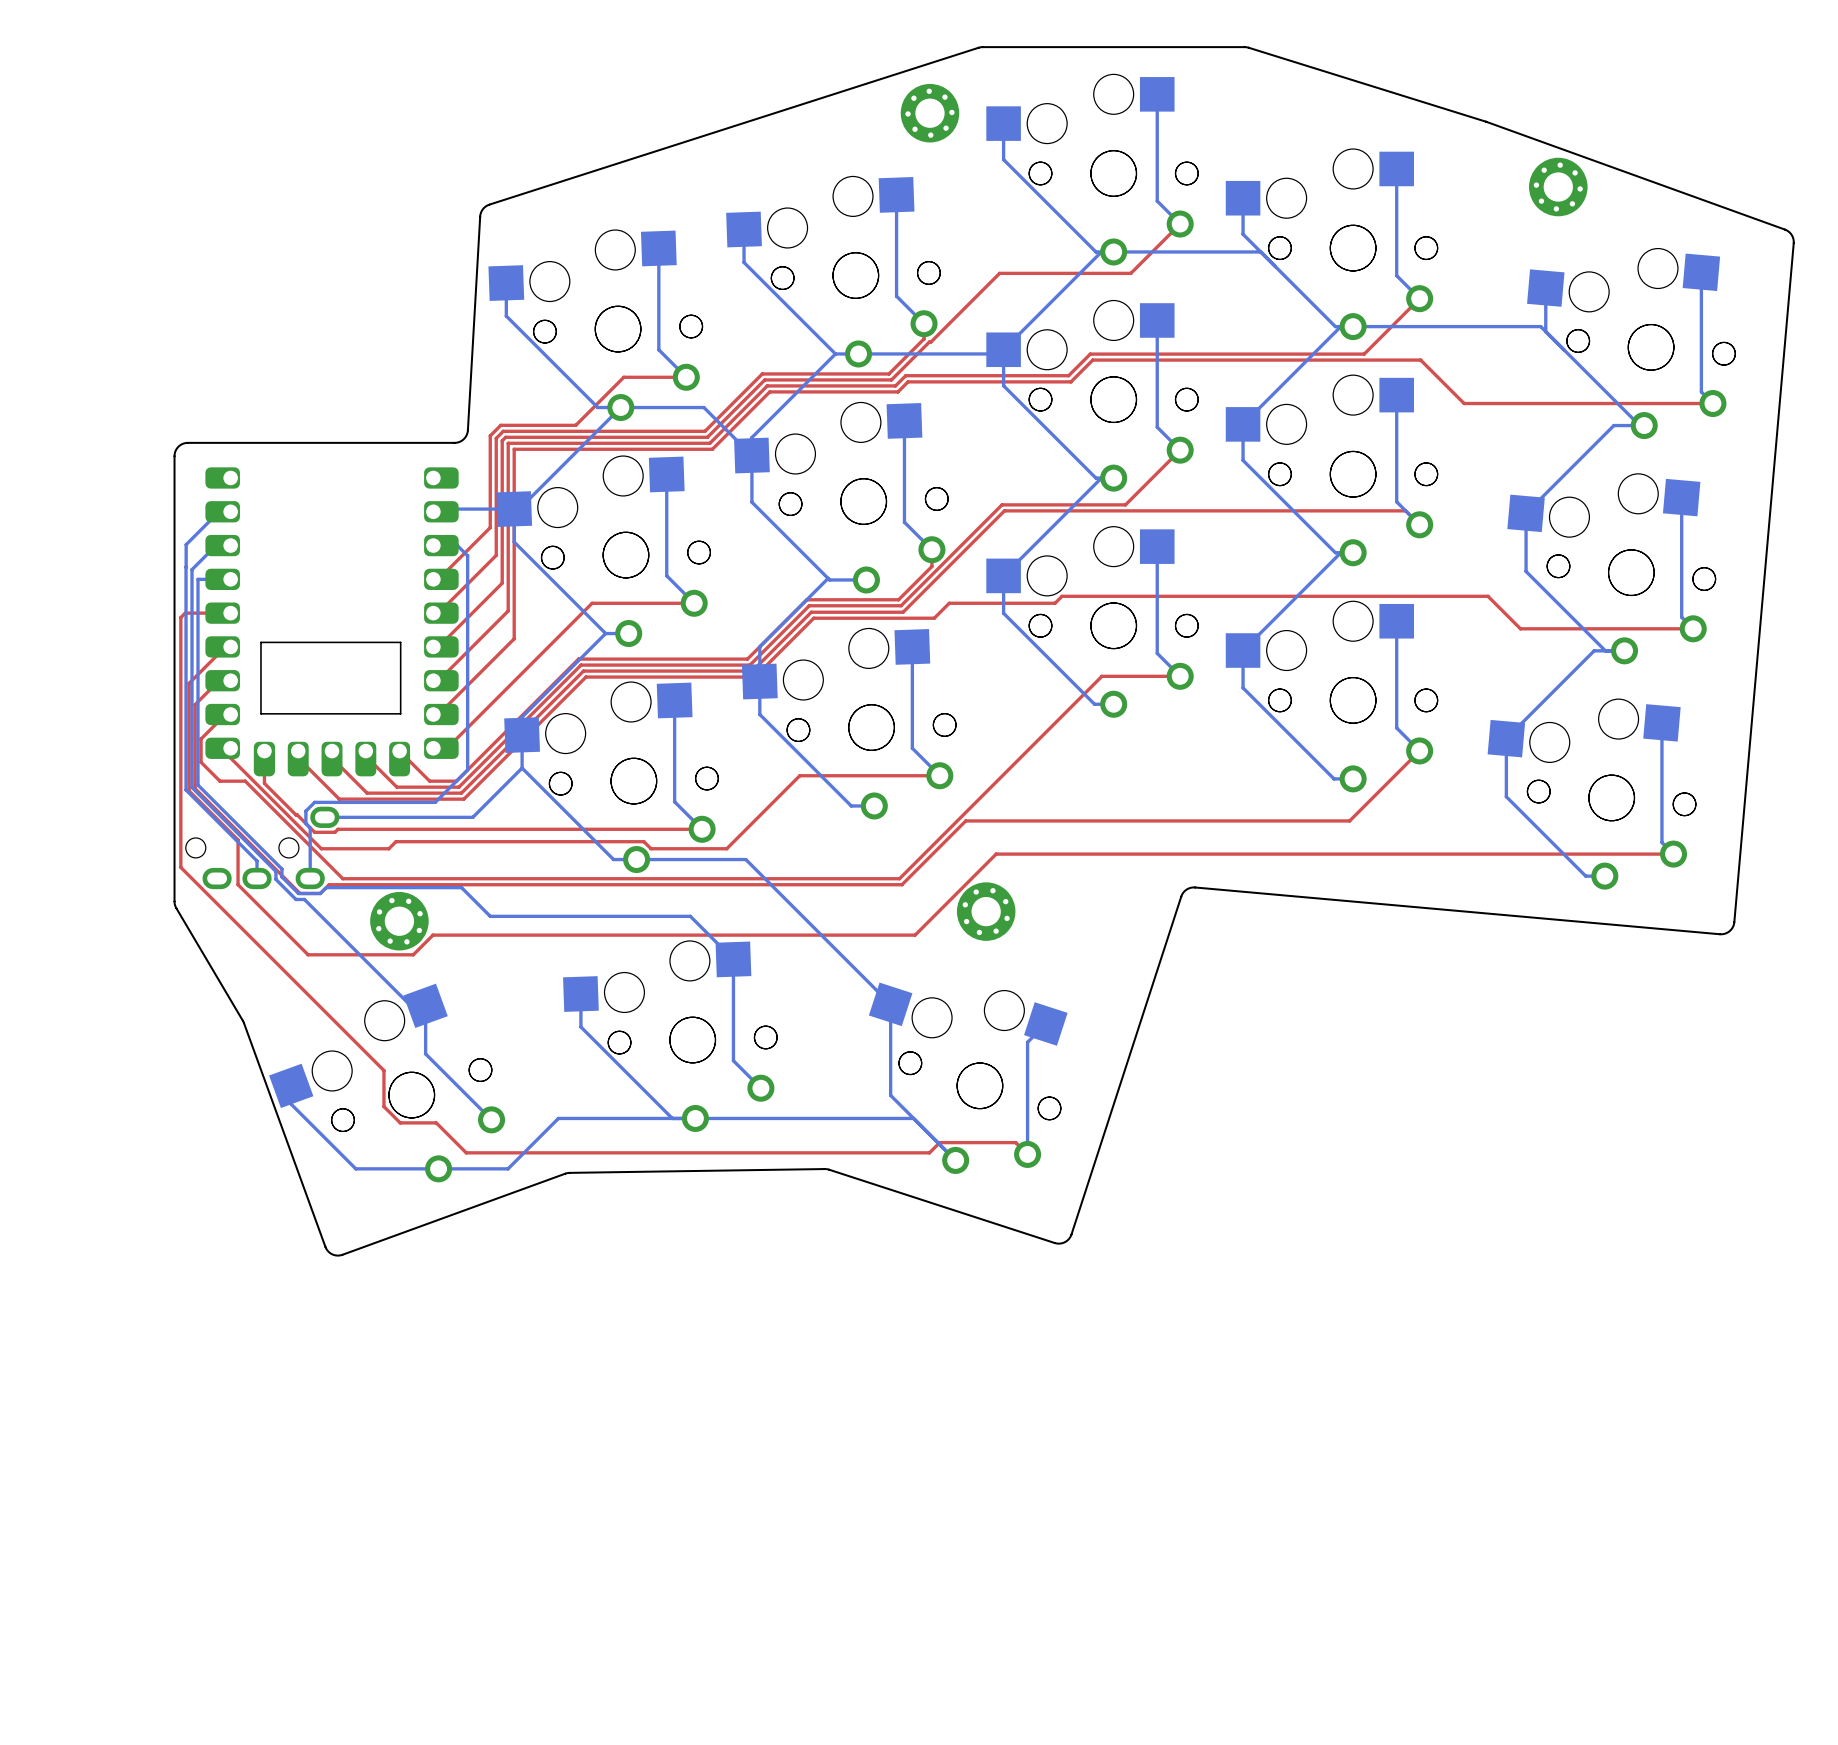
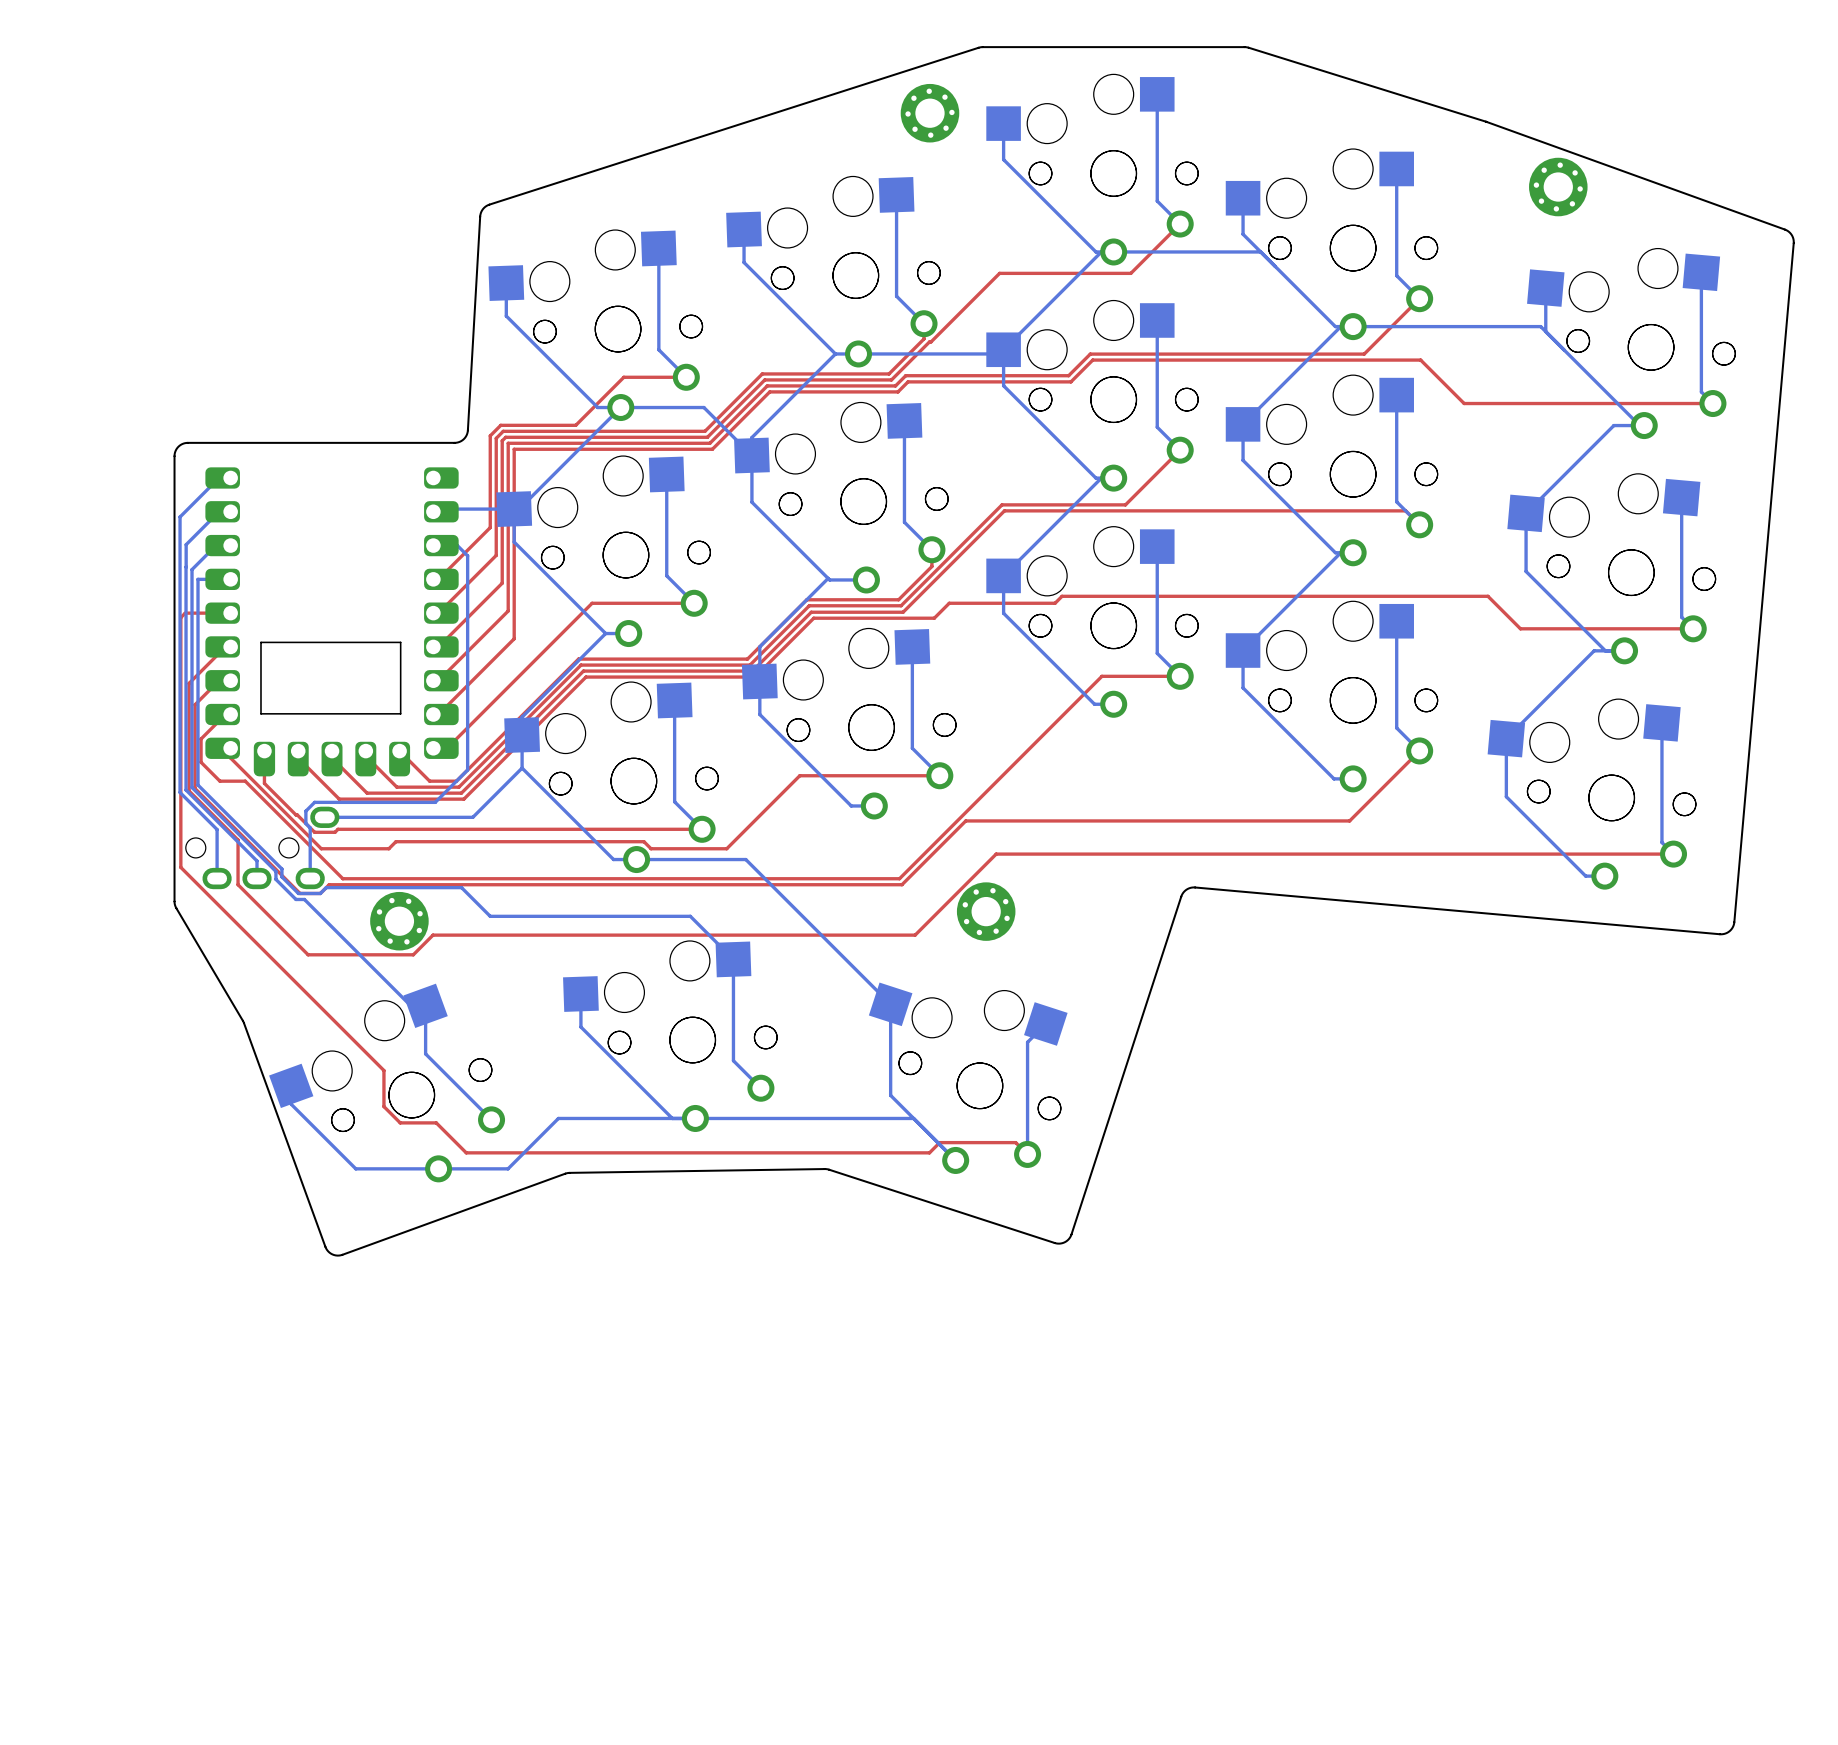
bottom track: none -> (230, 477) (219, 477) (180, 516) (180, 792) (217, 829) (217, 878)

